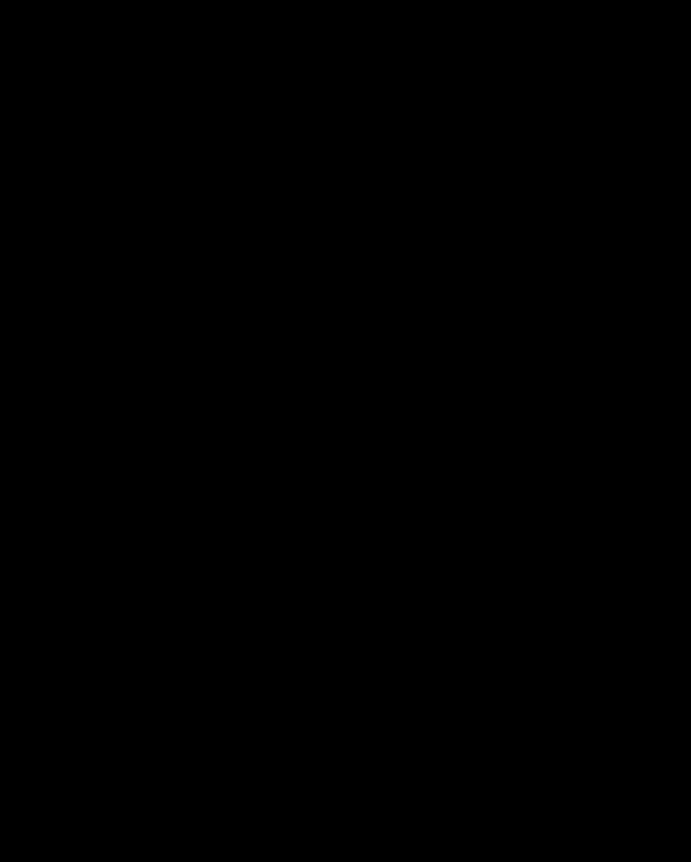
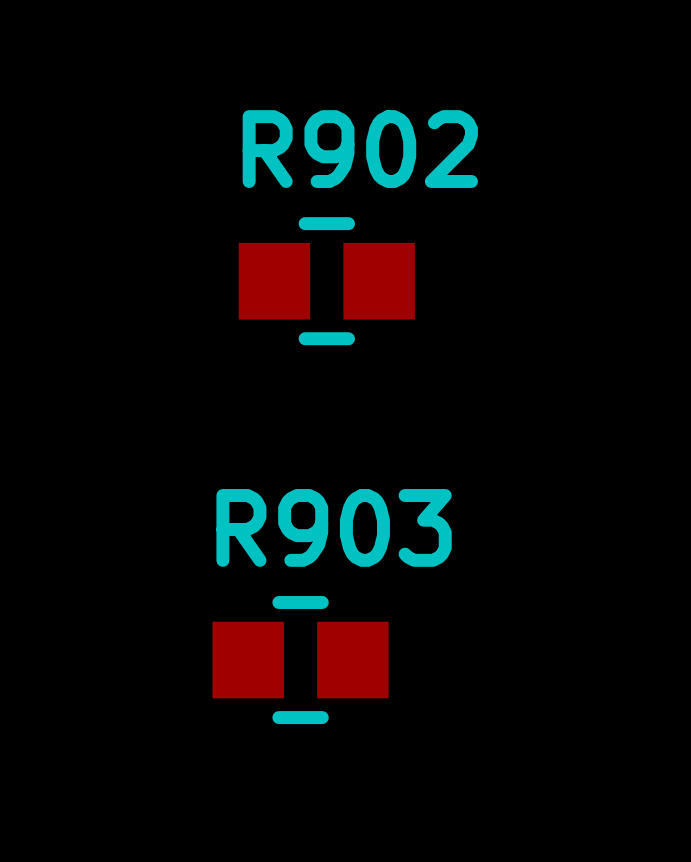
R902: none -> (326, 281)
R903: none -> (300, 660)

